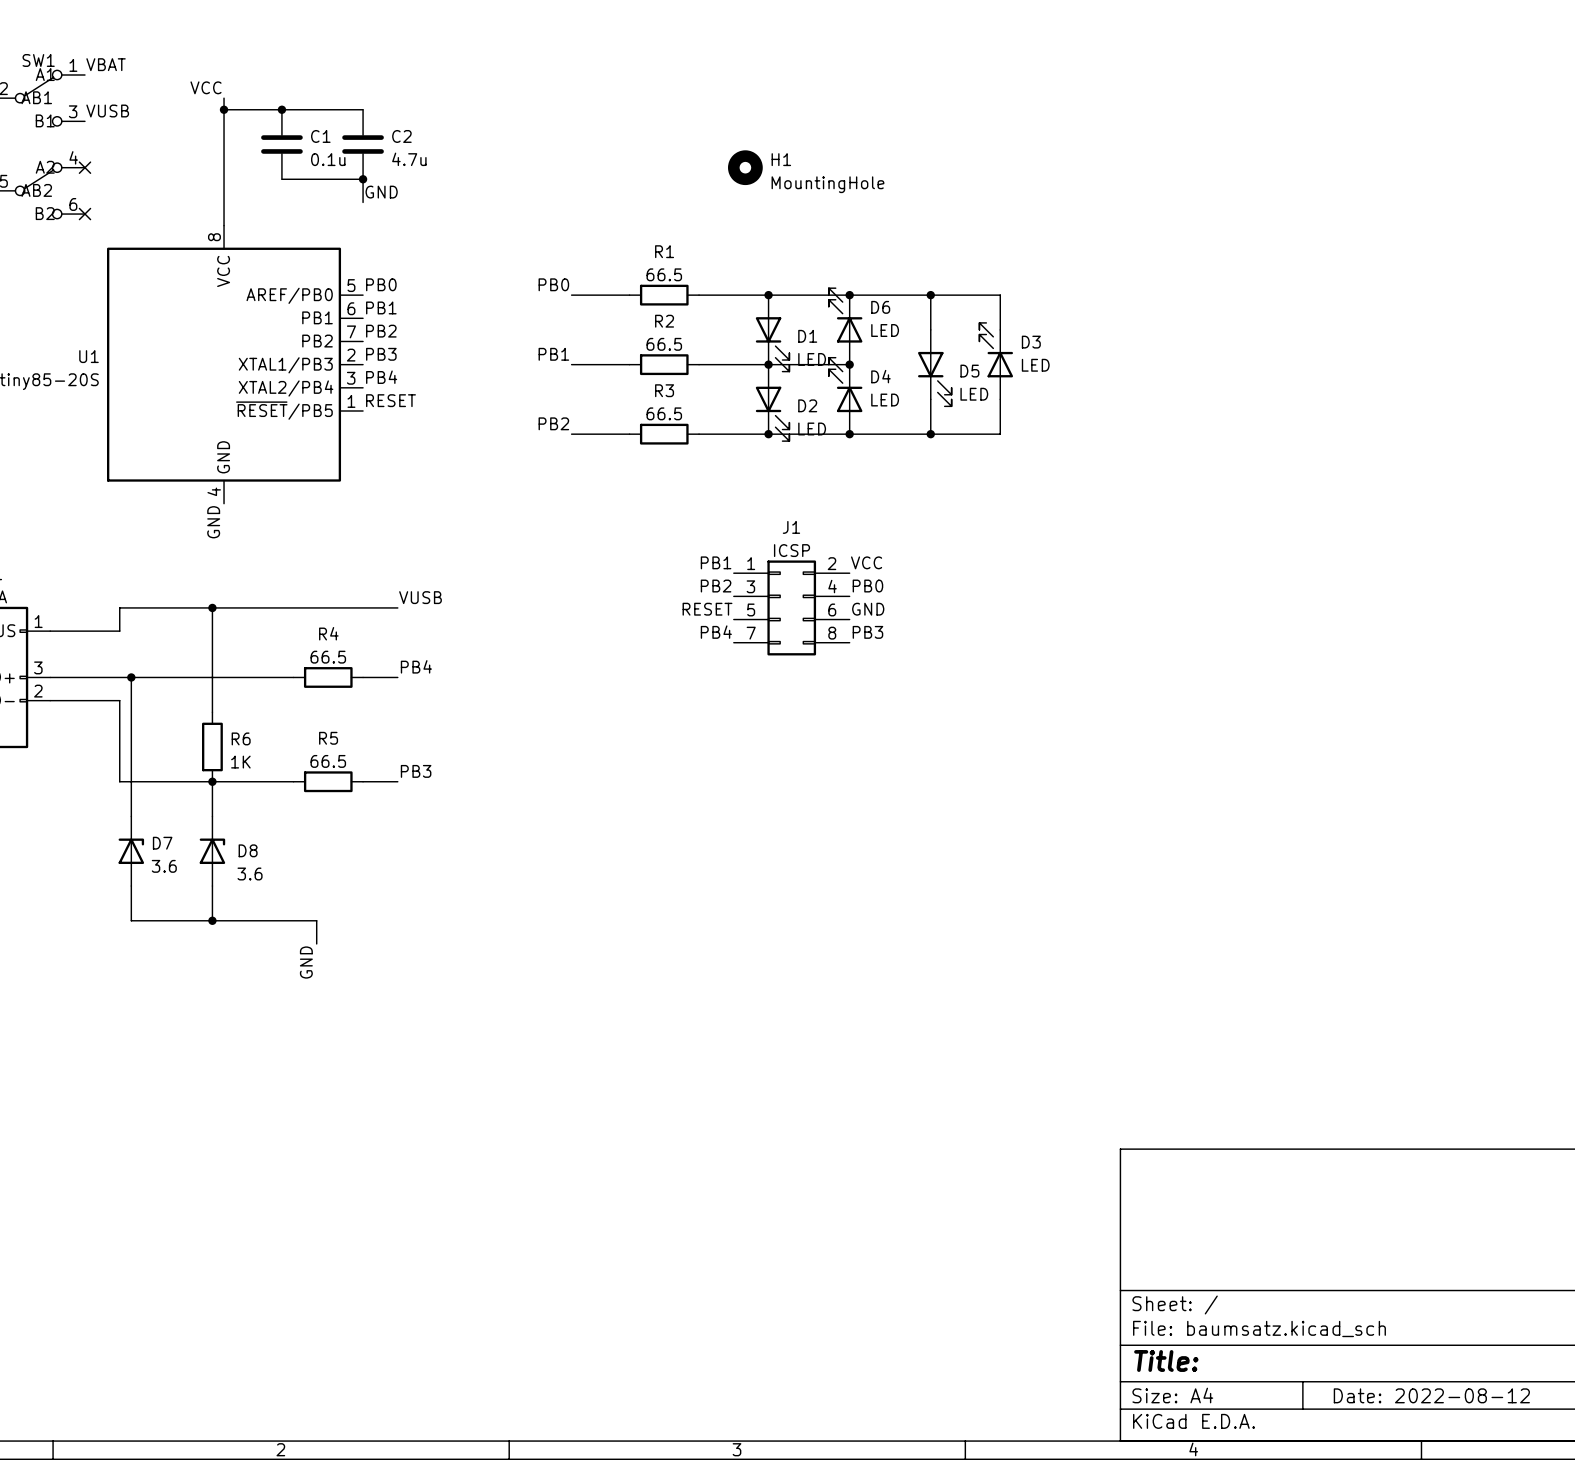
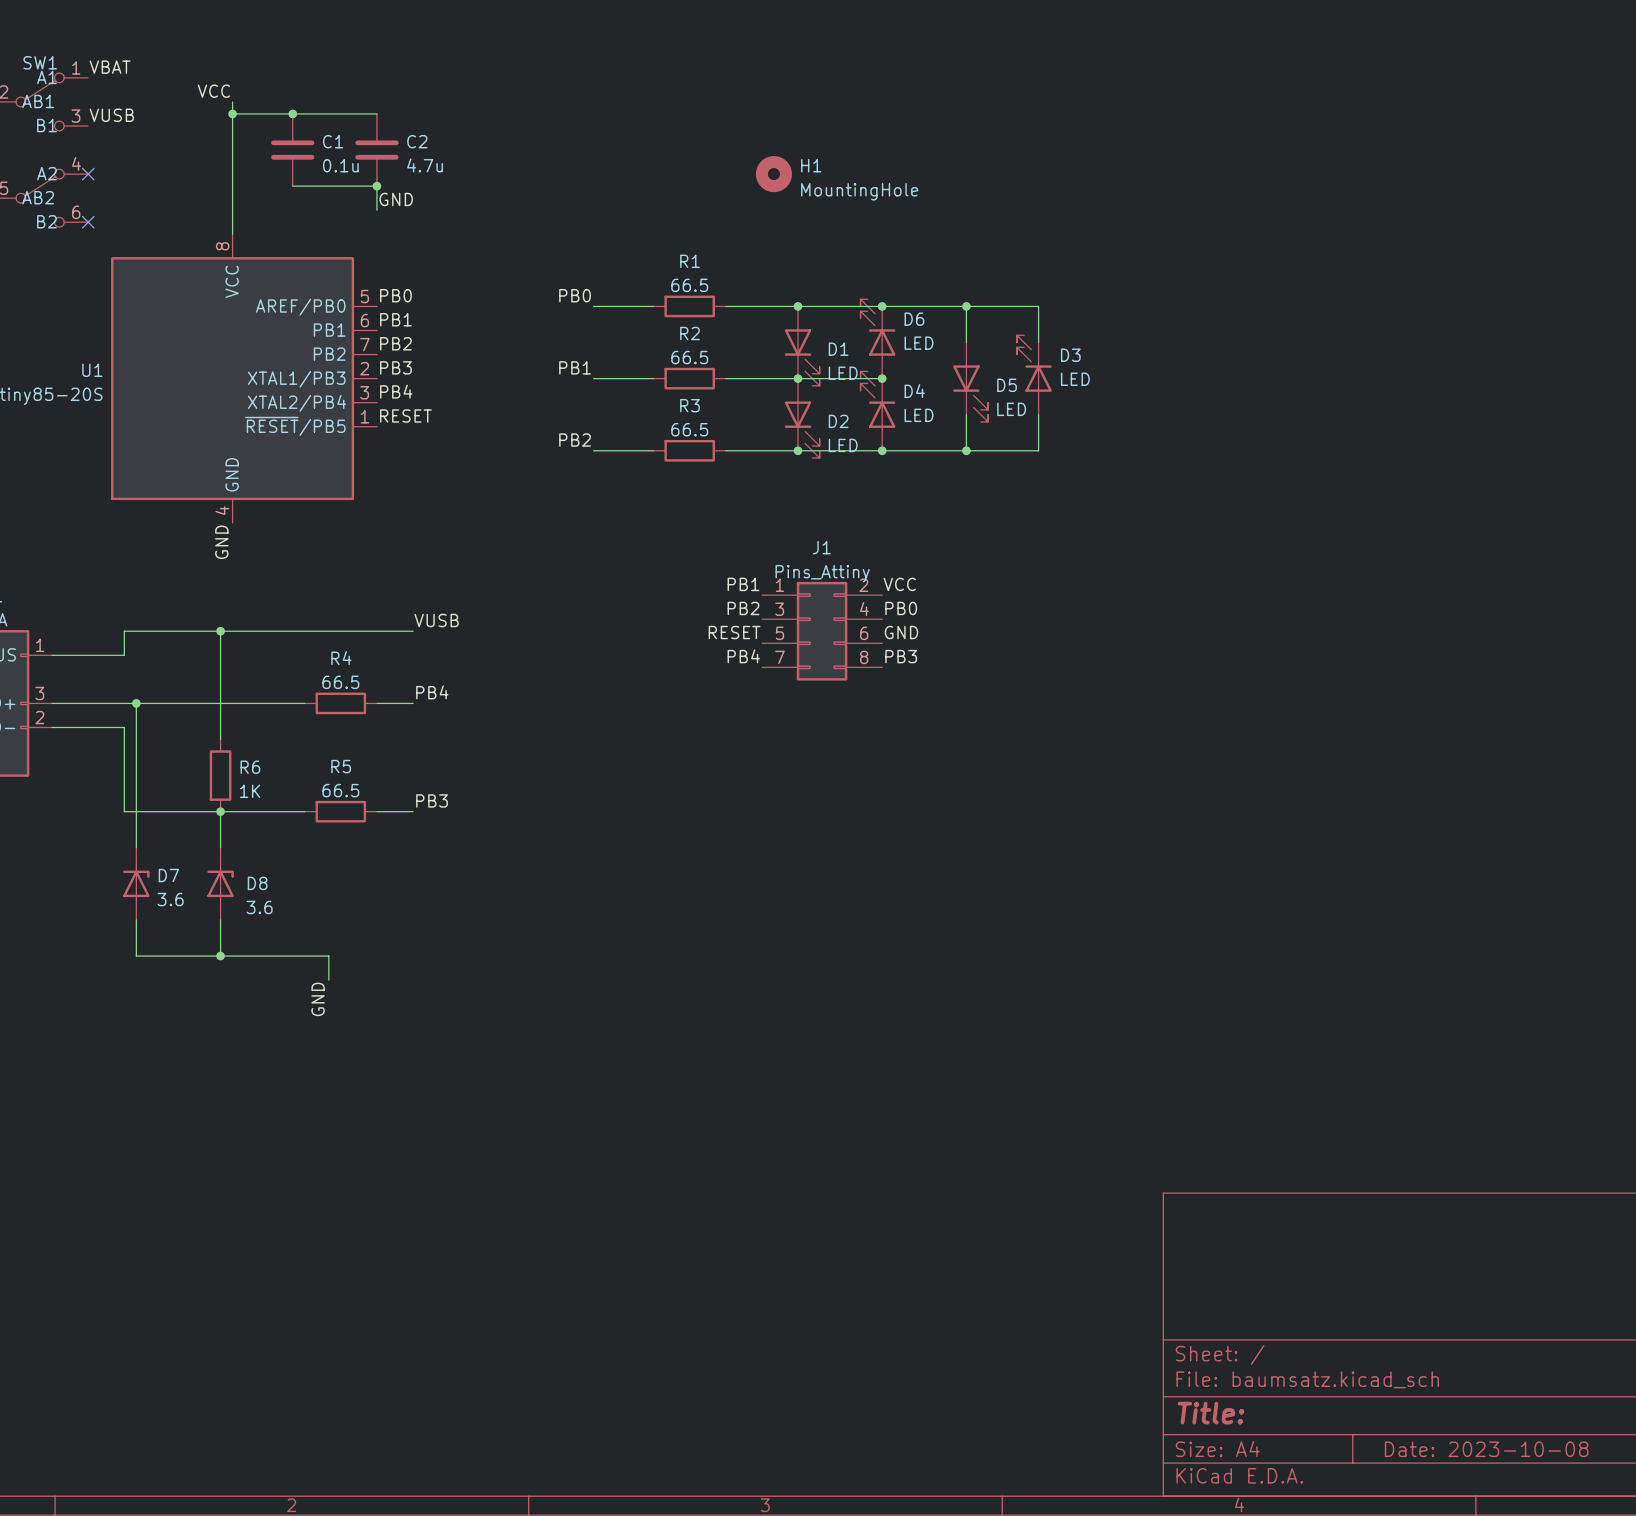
J1 value: ICSP (792, 550) -> Pins_Attiny (822, 573)
title block: Date: 2022-08-12 (1431, 1395) -> Date: 2023-10-08 (1486, 1449)

